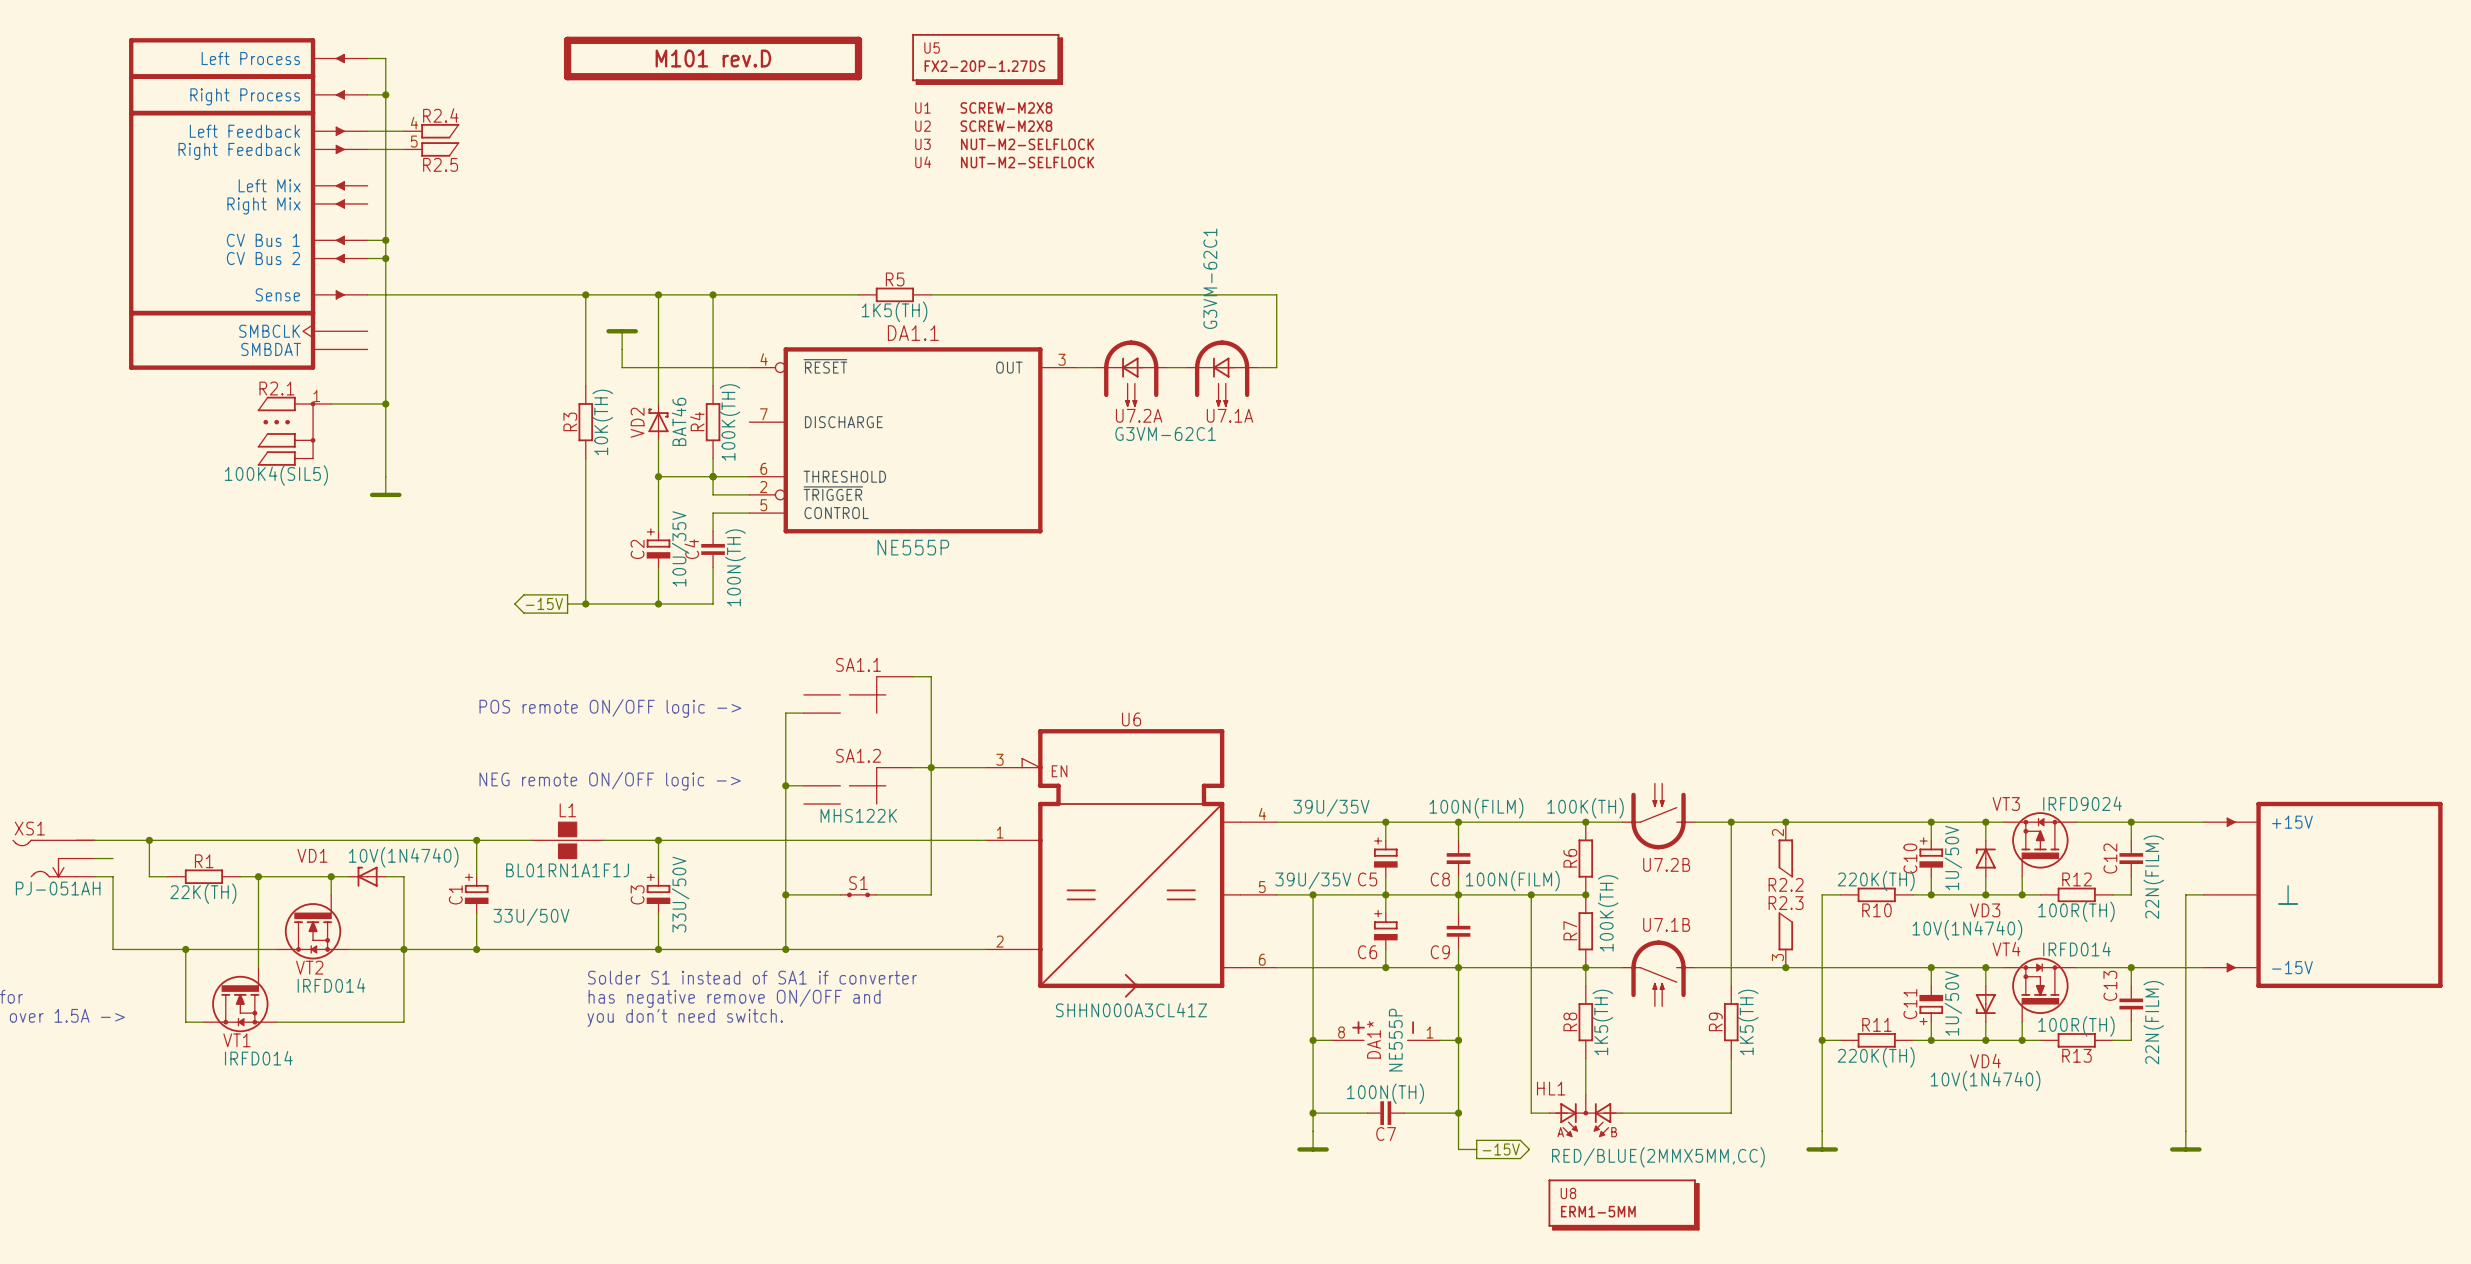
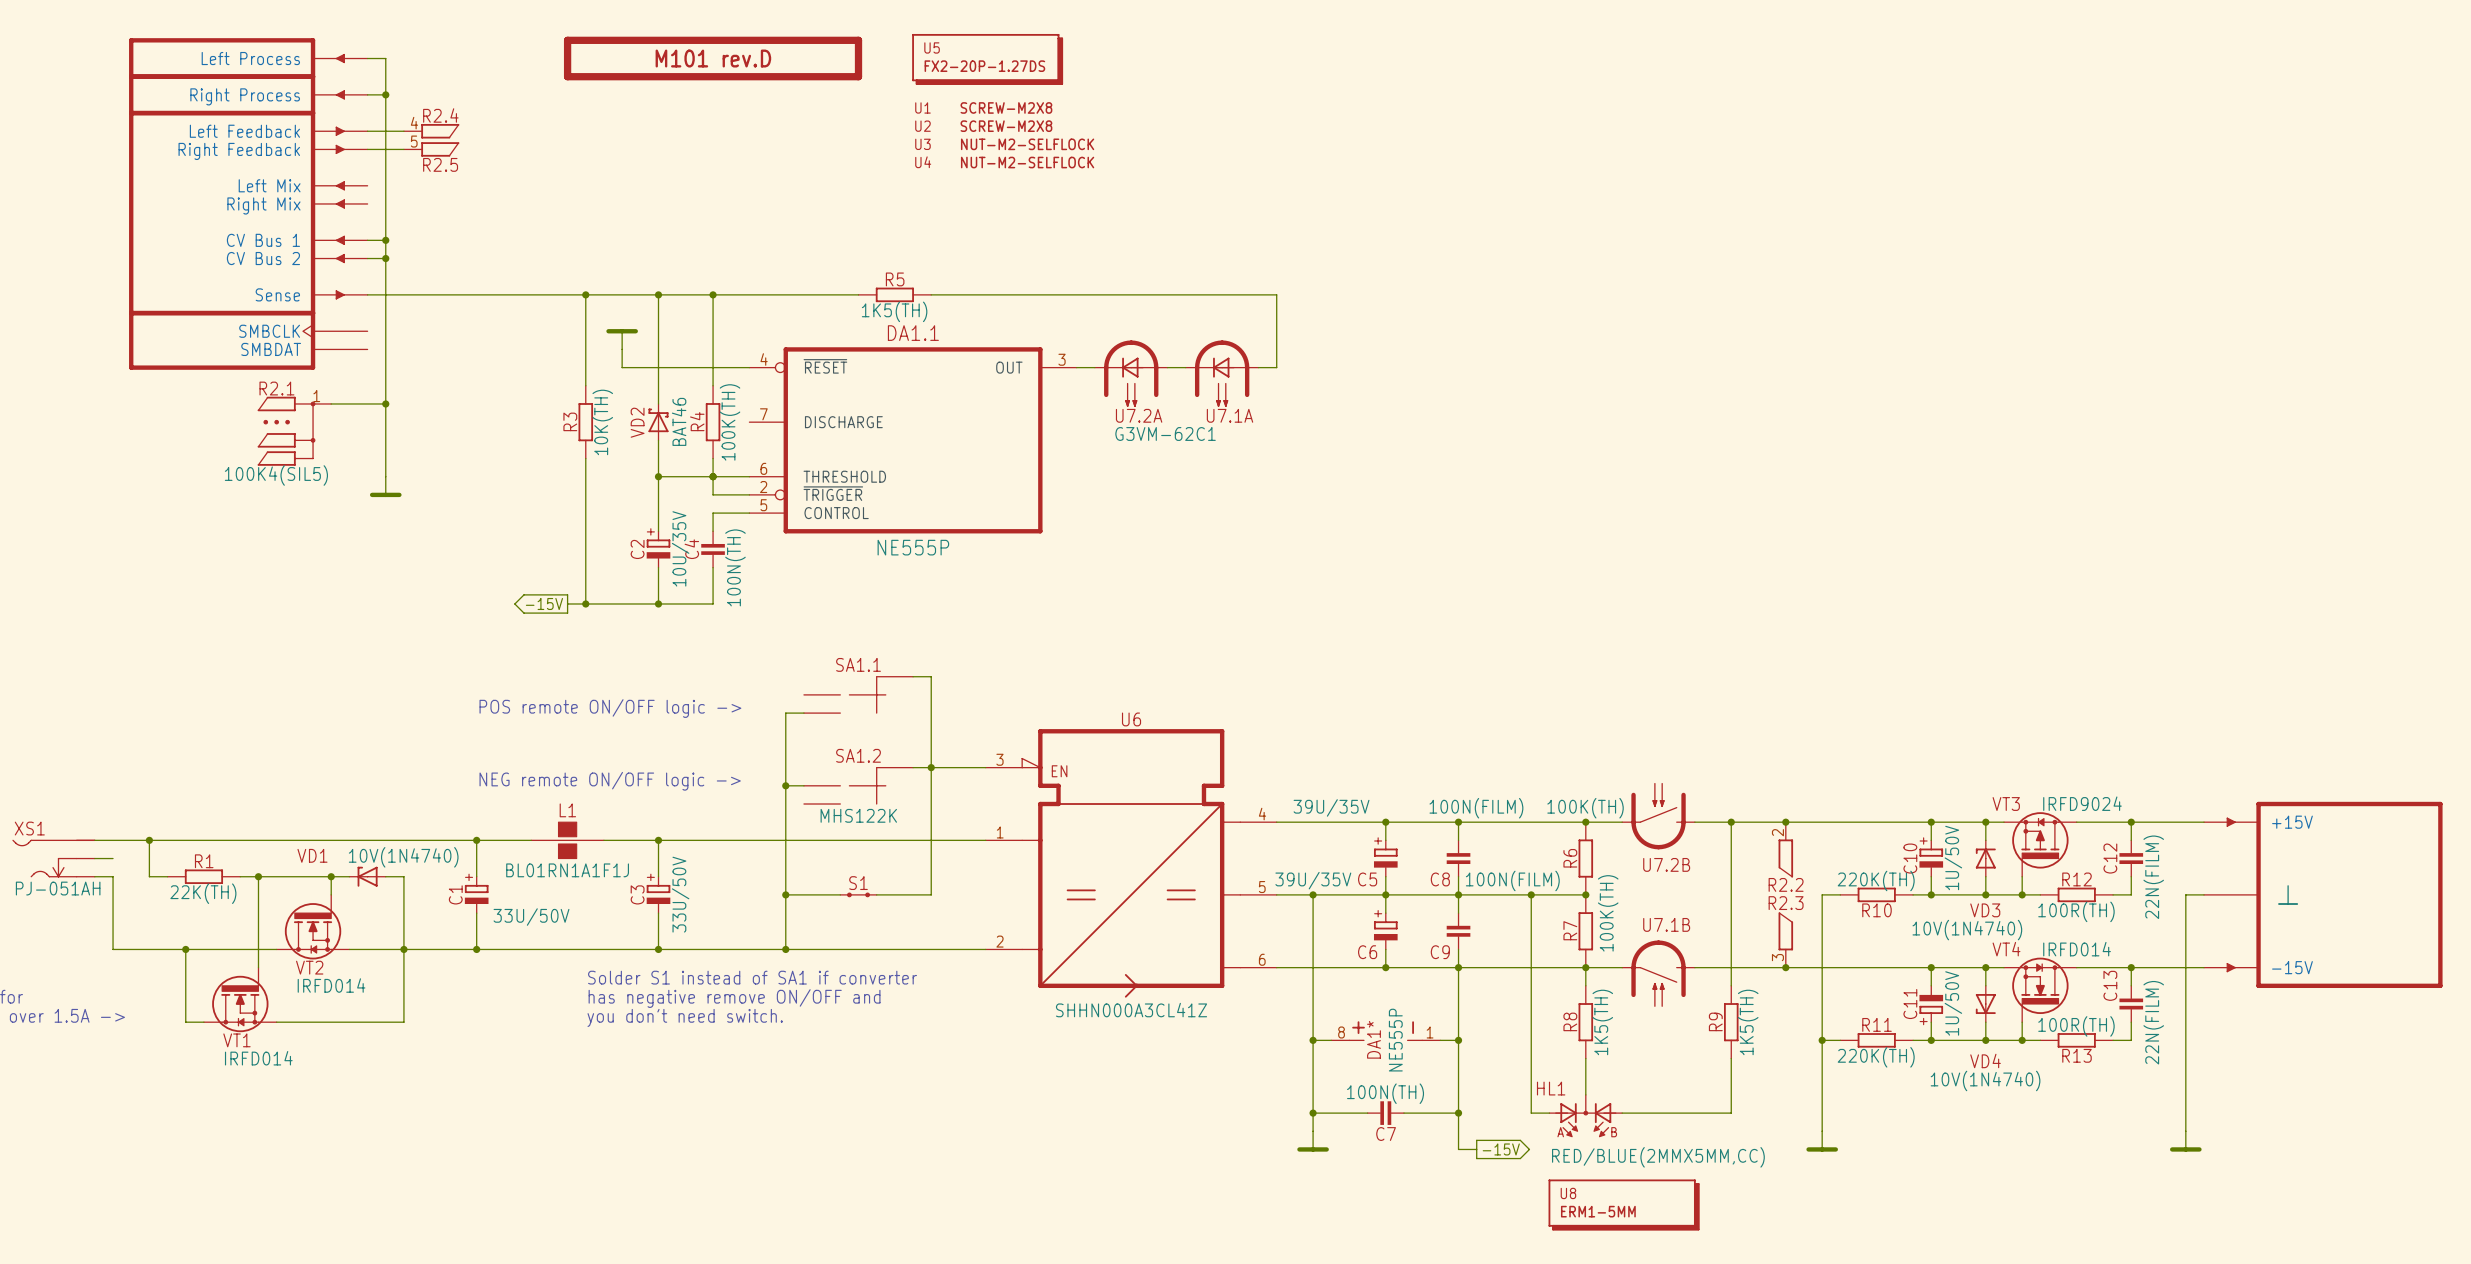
U7.1A value: G3VM-62C1 (1210, 278) -> none

